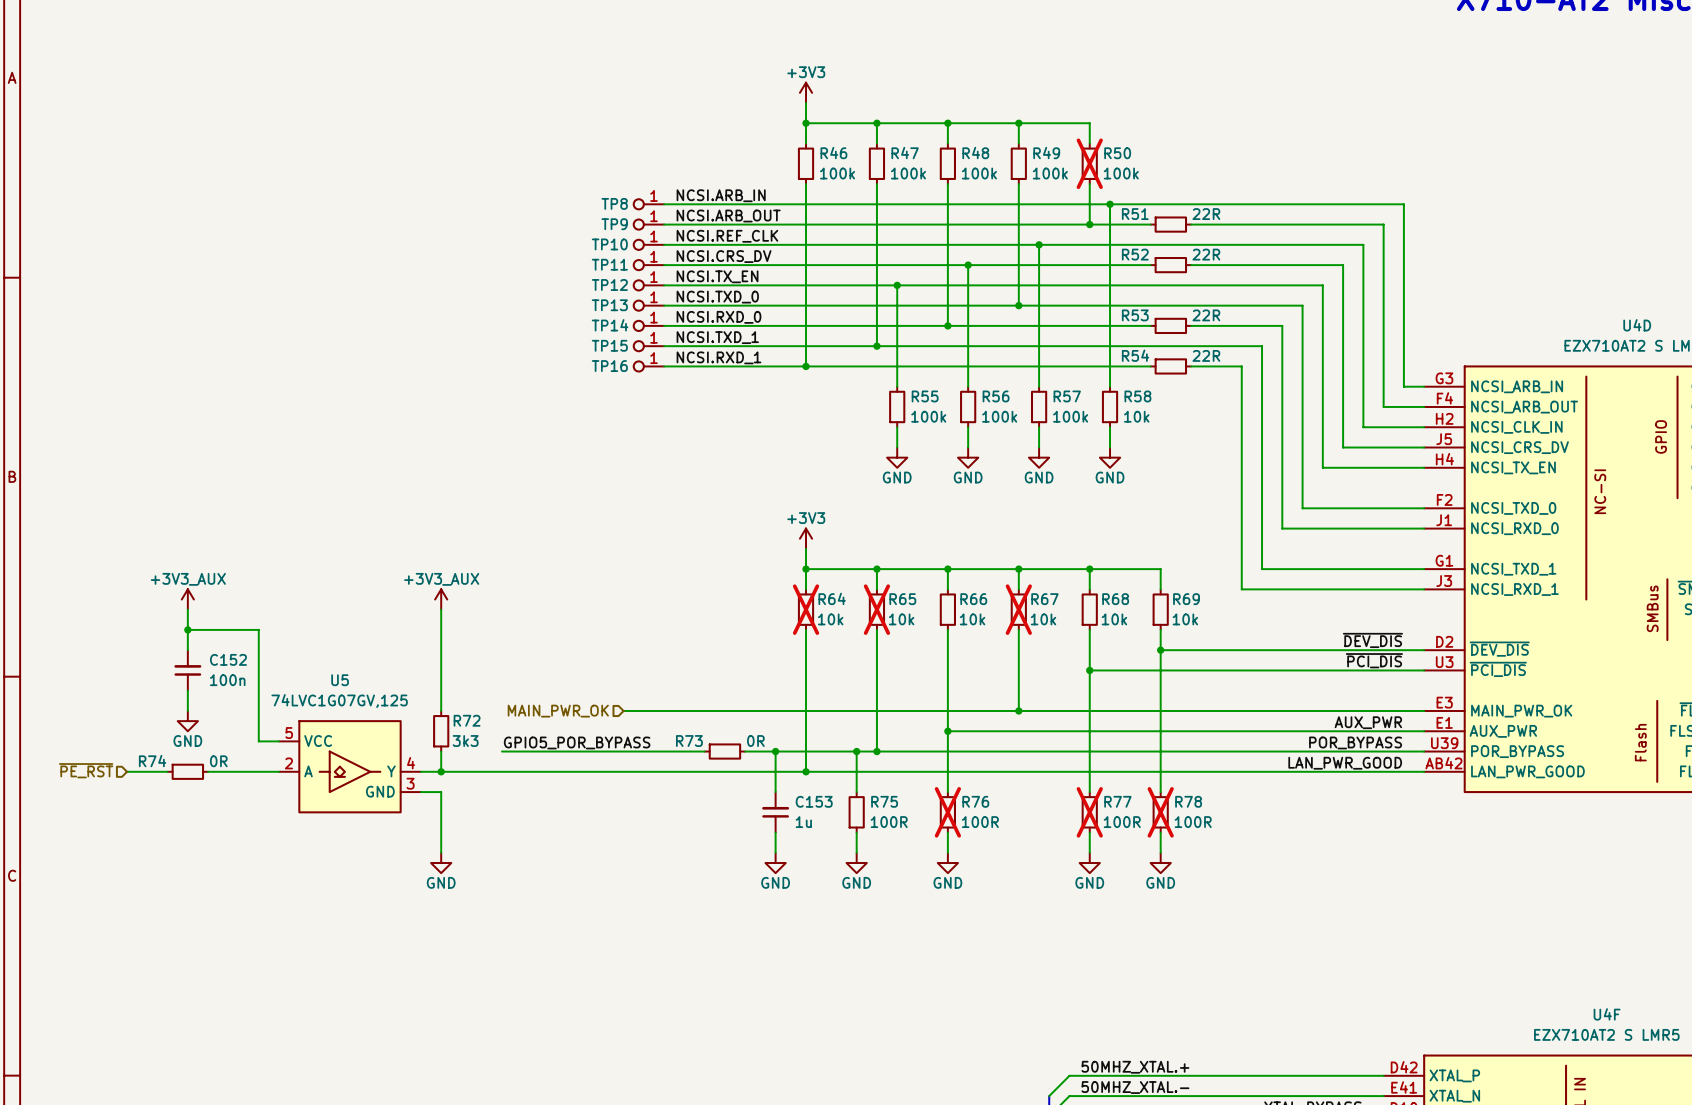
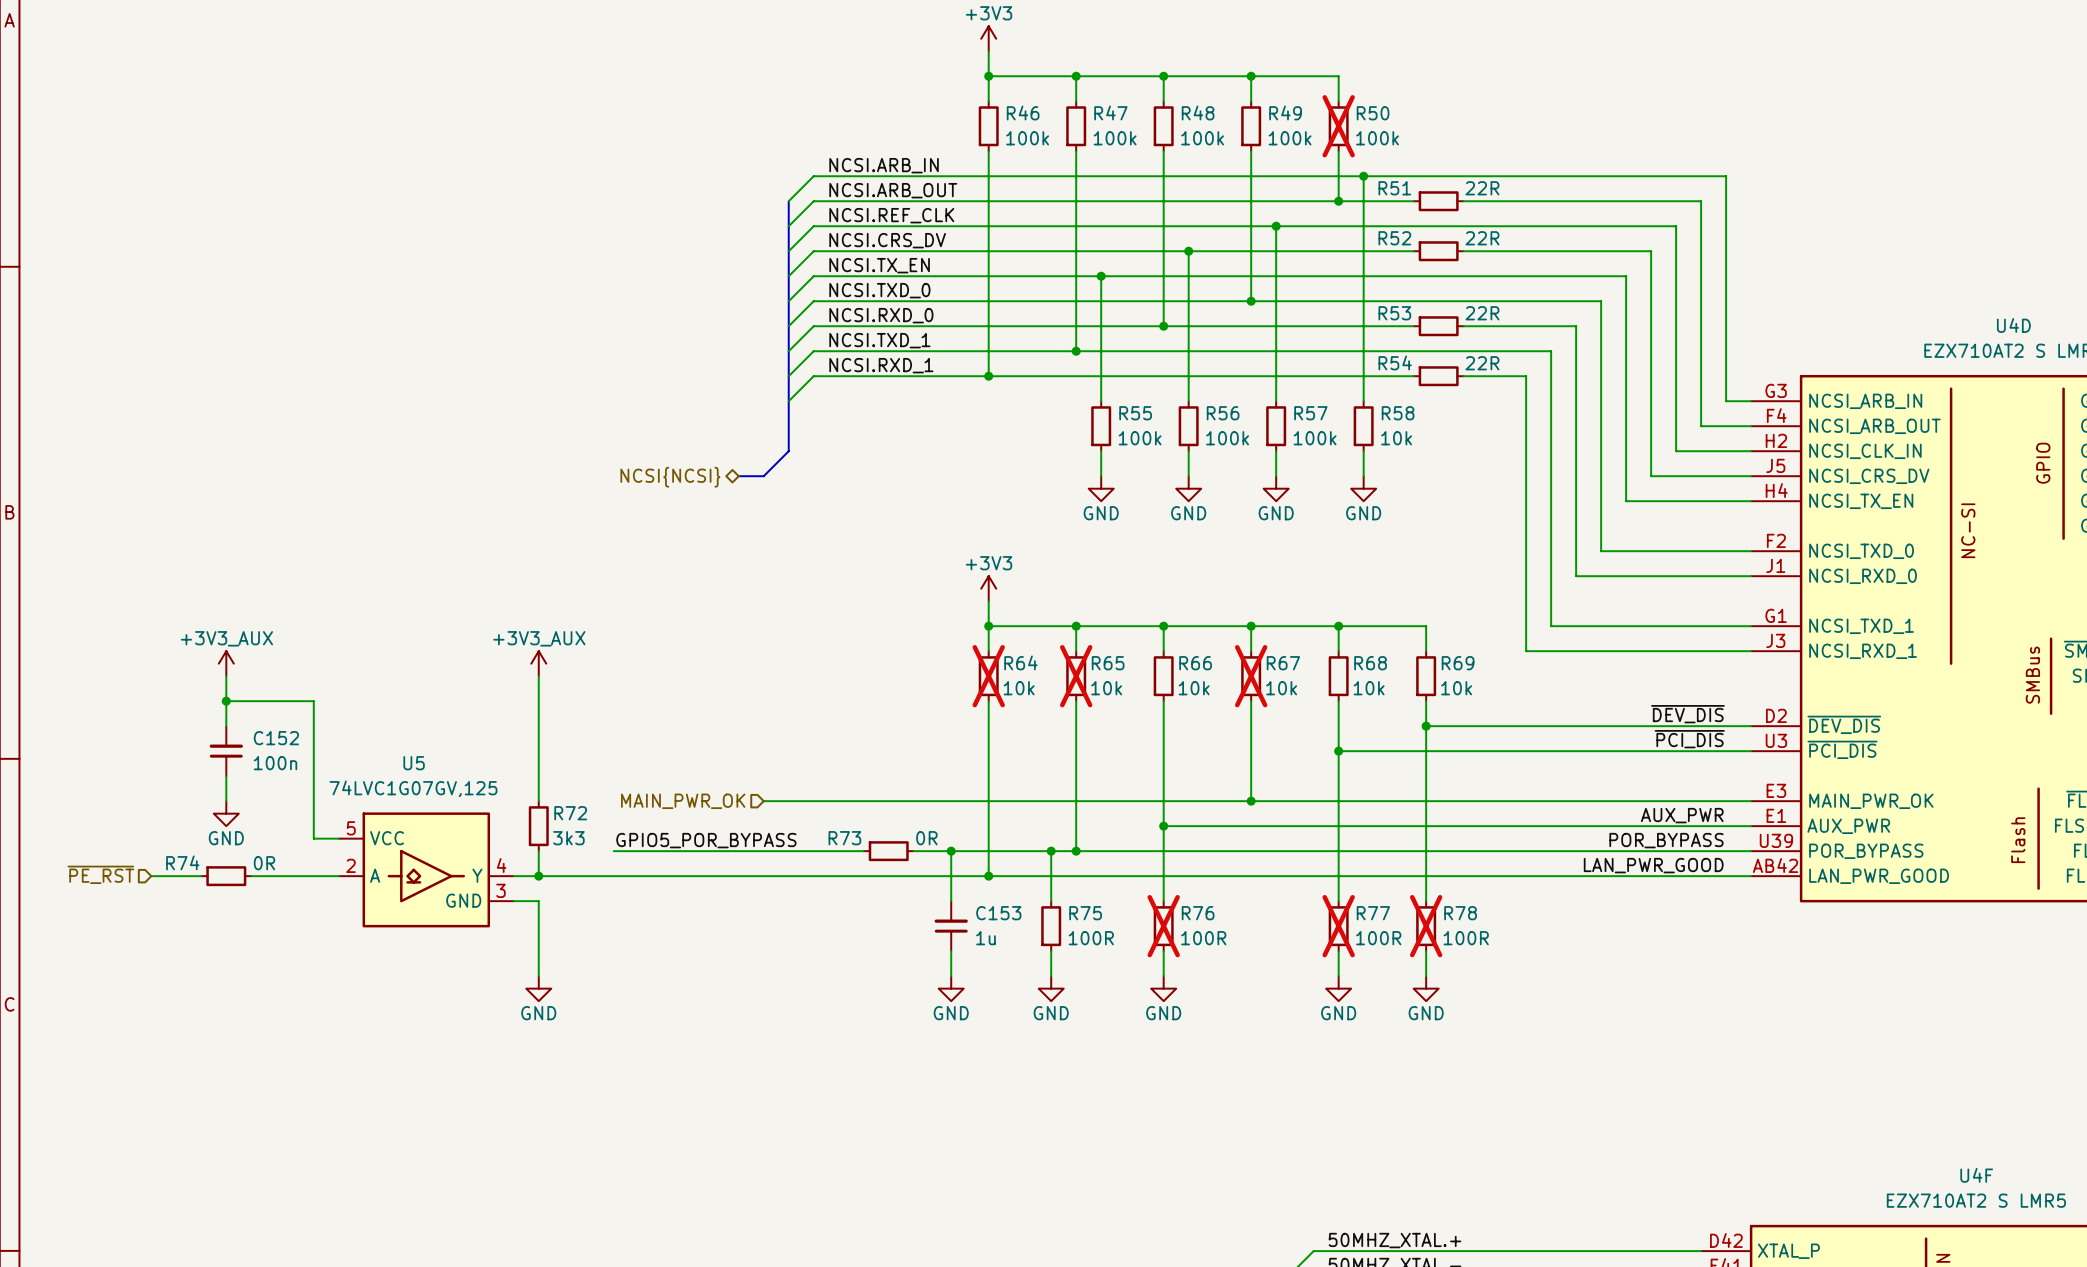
TP8: (648, 204) -> none
wire: none -> (813, 176) (788, 201)
bus: none -> (788, 201) (788, 451) (763, 476) (738, 476)
TP9: (648, 224) -> none
wire: none -> (813, 201) (788, 226)
TP10: (648, 244) -> none
wire: none -> (813, 226) (788, 251)
TP11: (648, 265) -> none
wire: none -> (813, 251) (788, 276)
TP12: (648, 285) -> none
wire: none -> (813, 276) (788, 301)
TP13: (648, 305) -> none
wire: none -> (813, 301) (788, 326)
TP14: (648, 325) -> none
wire: none -> (813, 326) (788, 351)
TP15: (648, 346) -> none
wire: none -> (813, 351) (788, 376)
TP16: (648, 366) -> none
wire: none -> (813, 376) (788, 401)
hierarchical label: none -> NCSI{NCSI} (670, 477)

